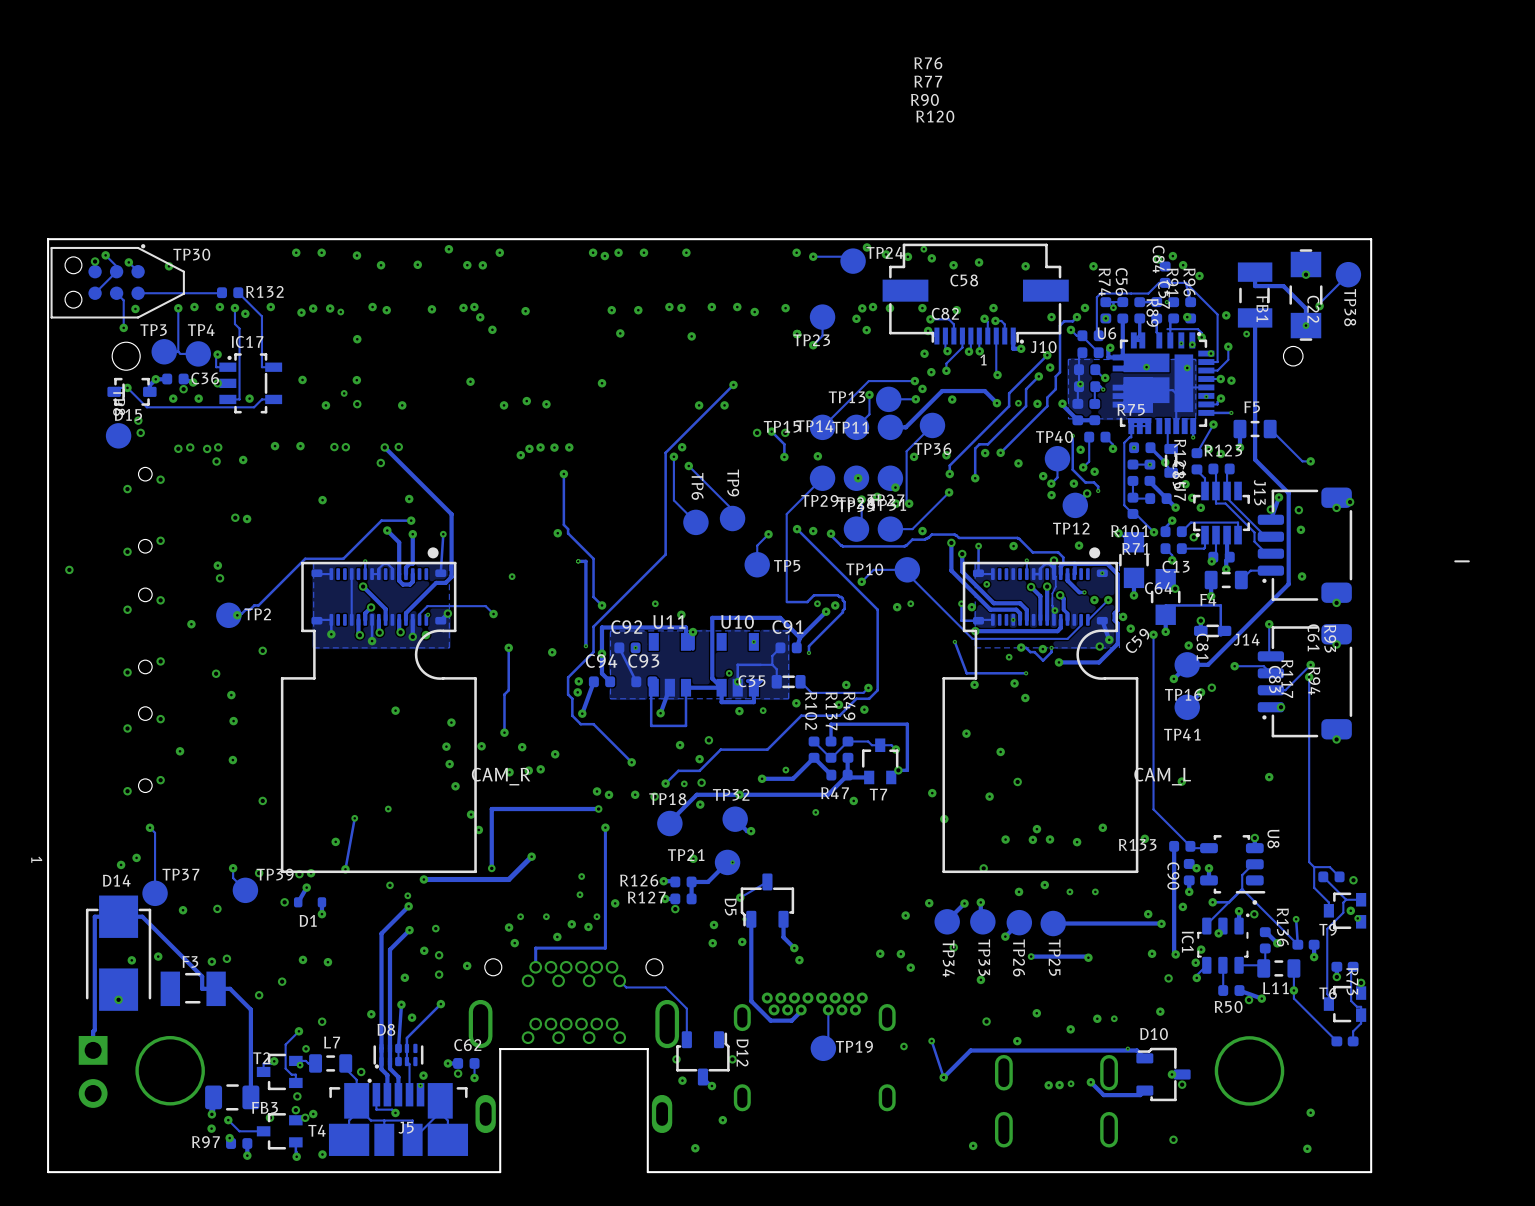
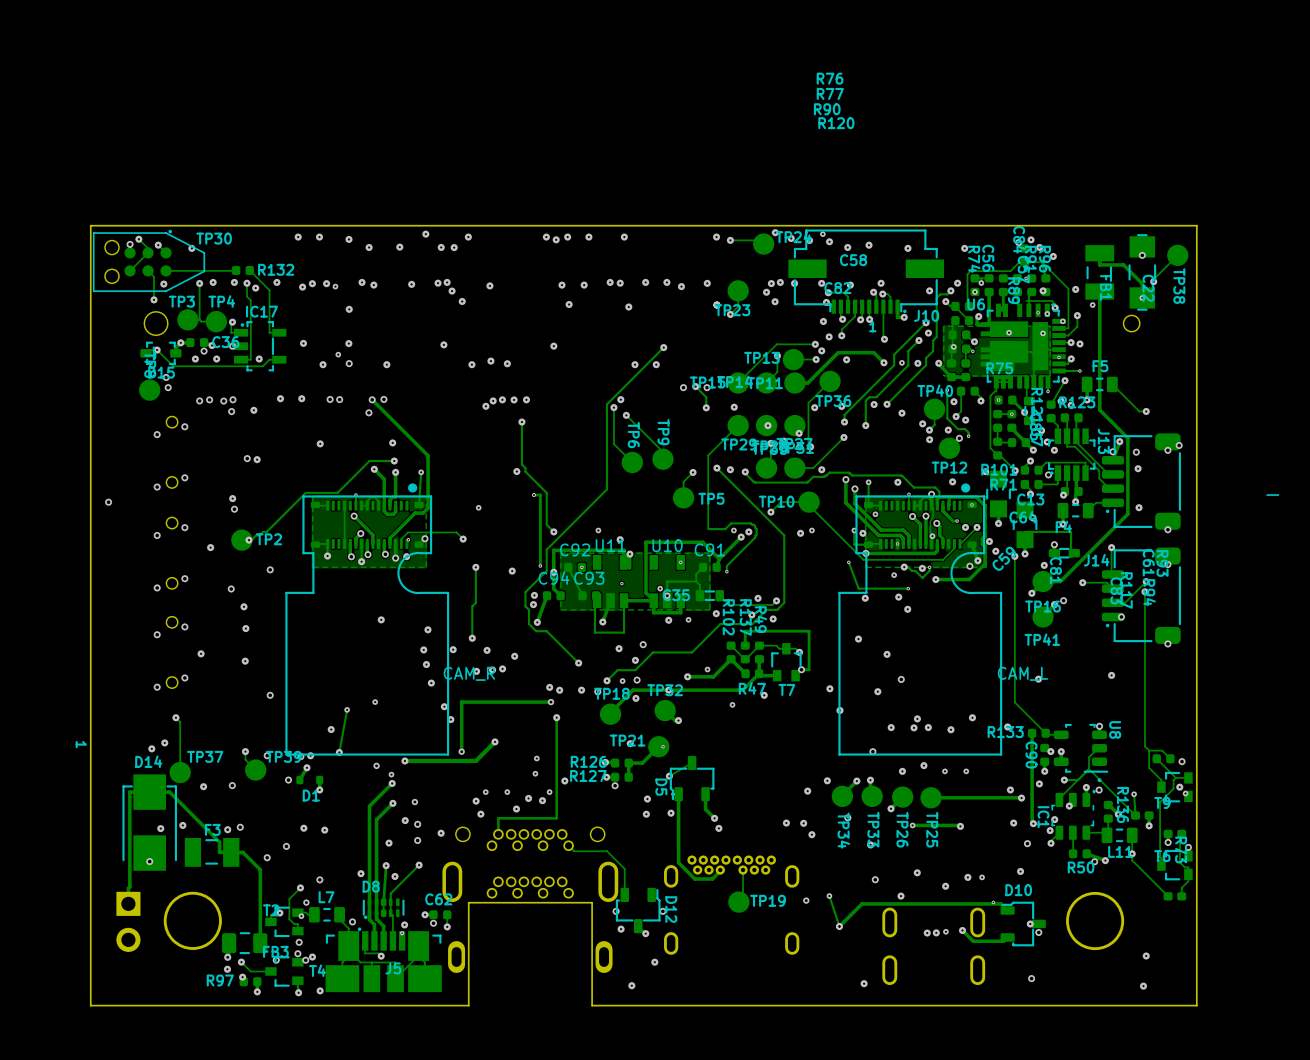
via: none -> (621, 583)

